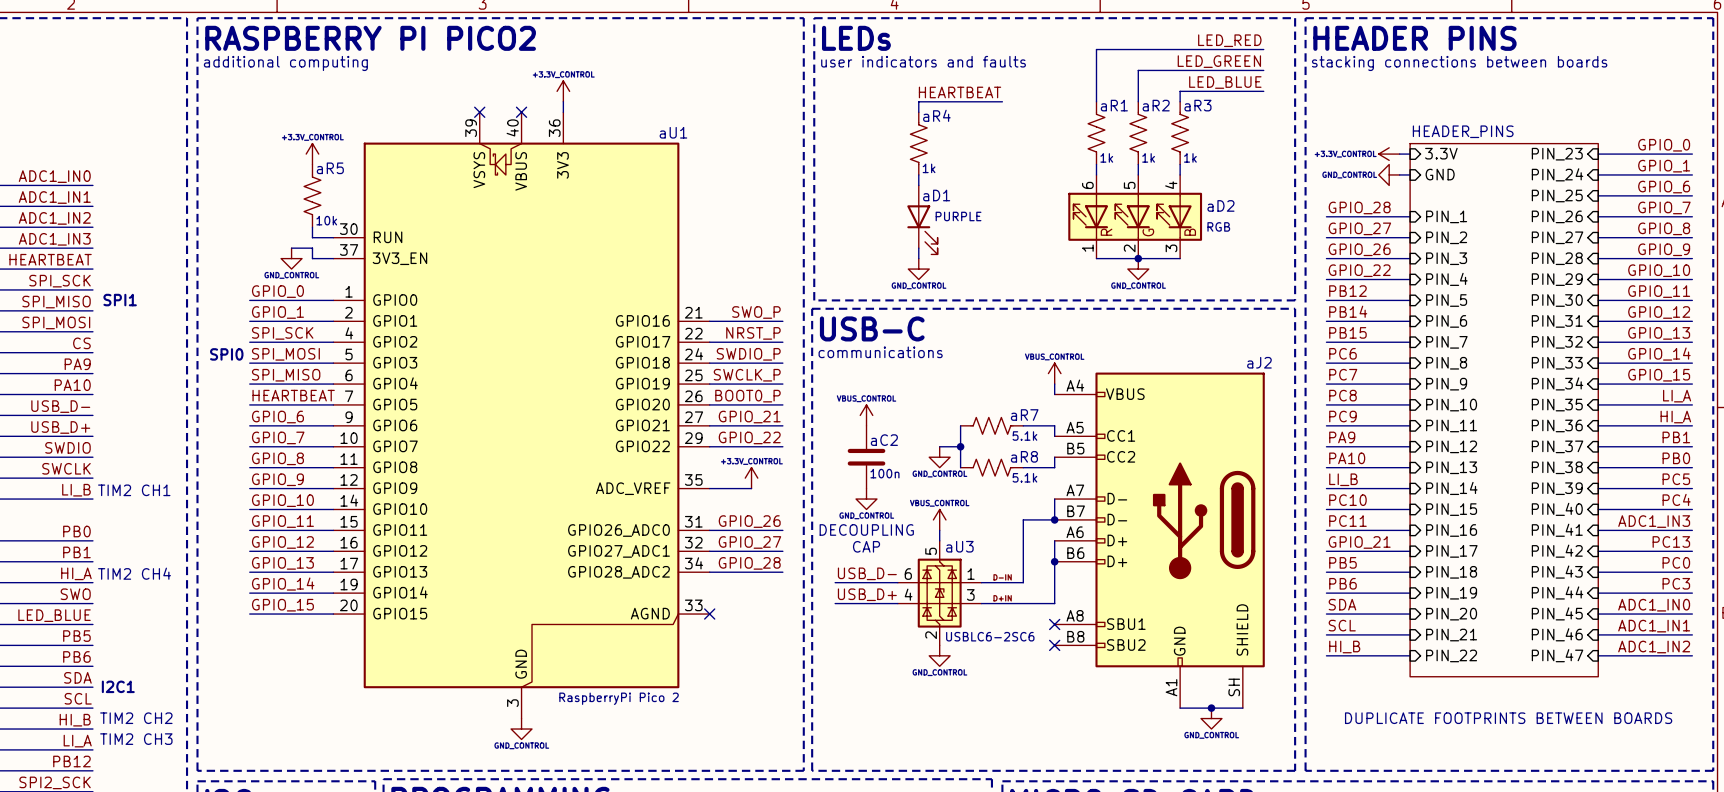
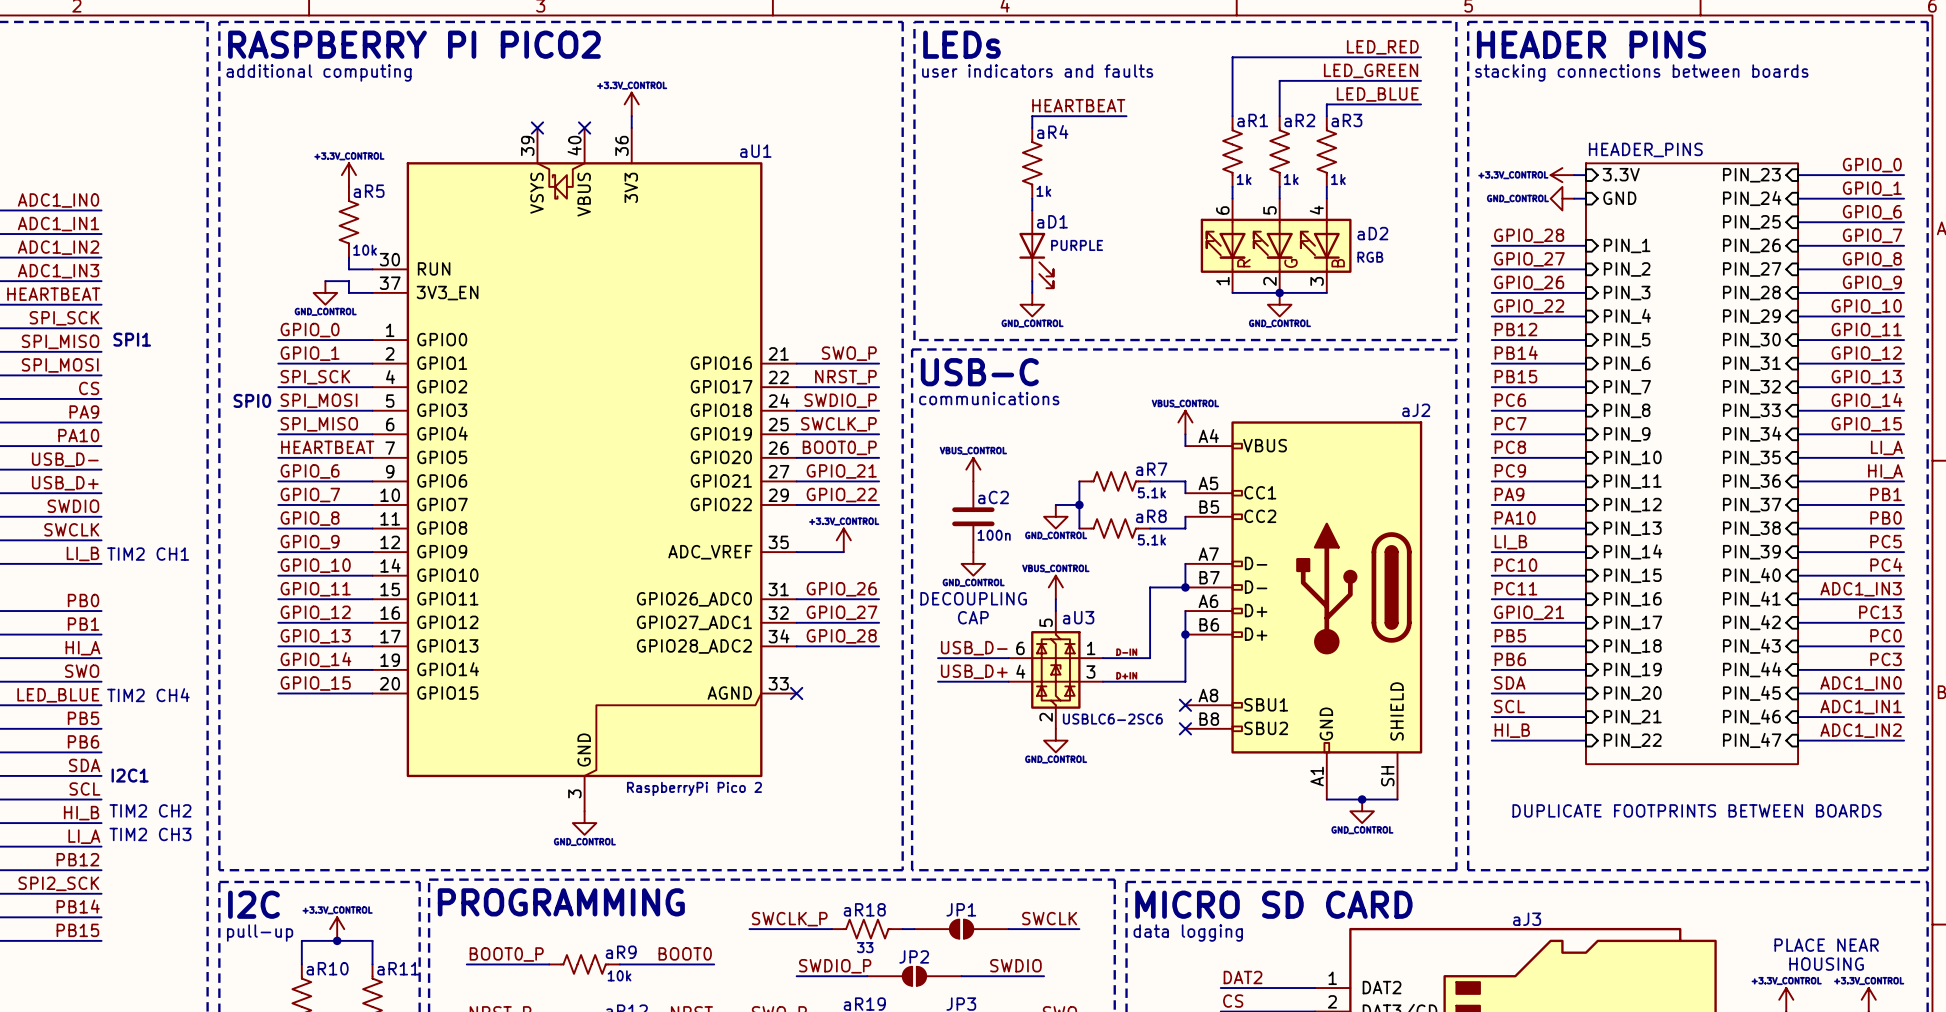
text position: TIM2 CH4 (134, 573) -> TIM2 CH4 (148, 695)

